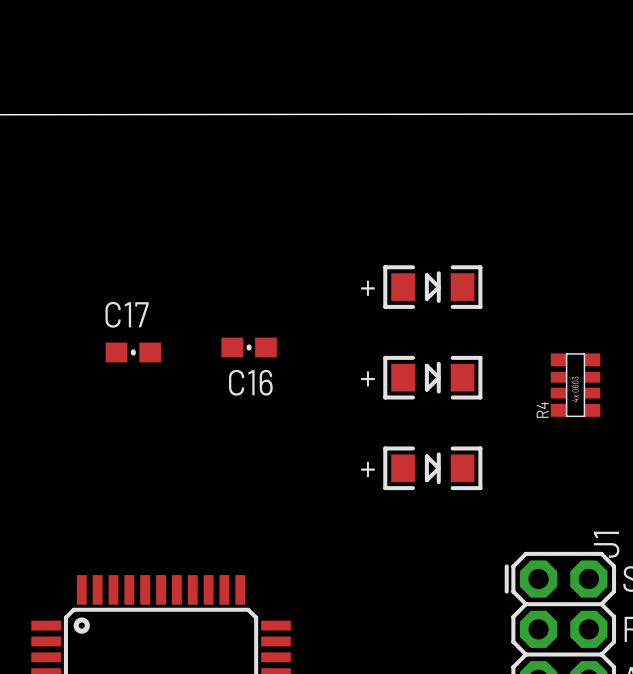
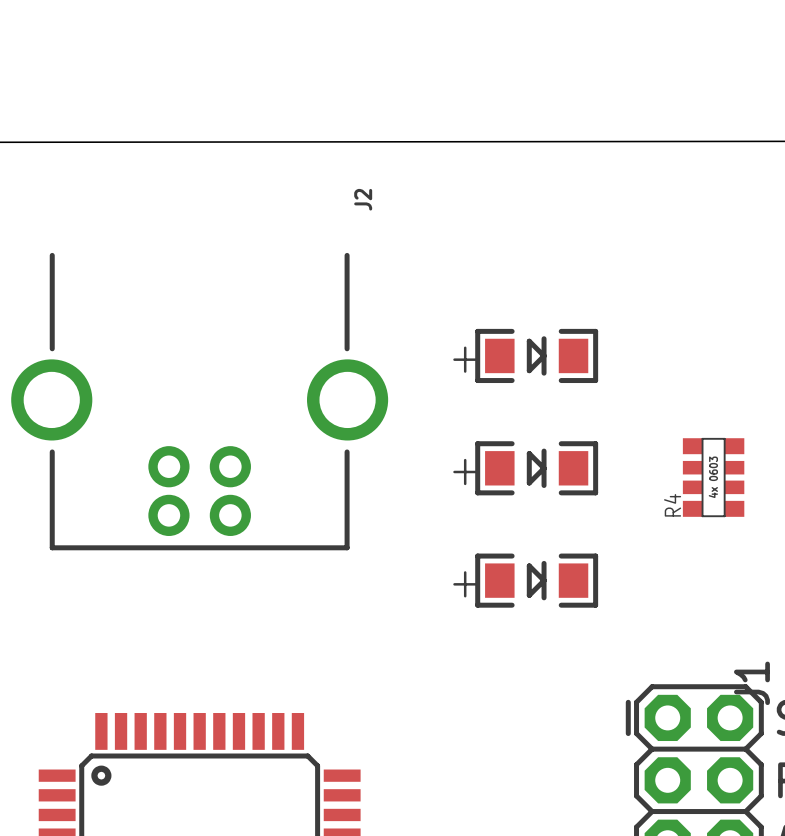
J2: none -> (199, 401)
C16: (249, 347) -> none
C17: (133, 352) -> none

